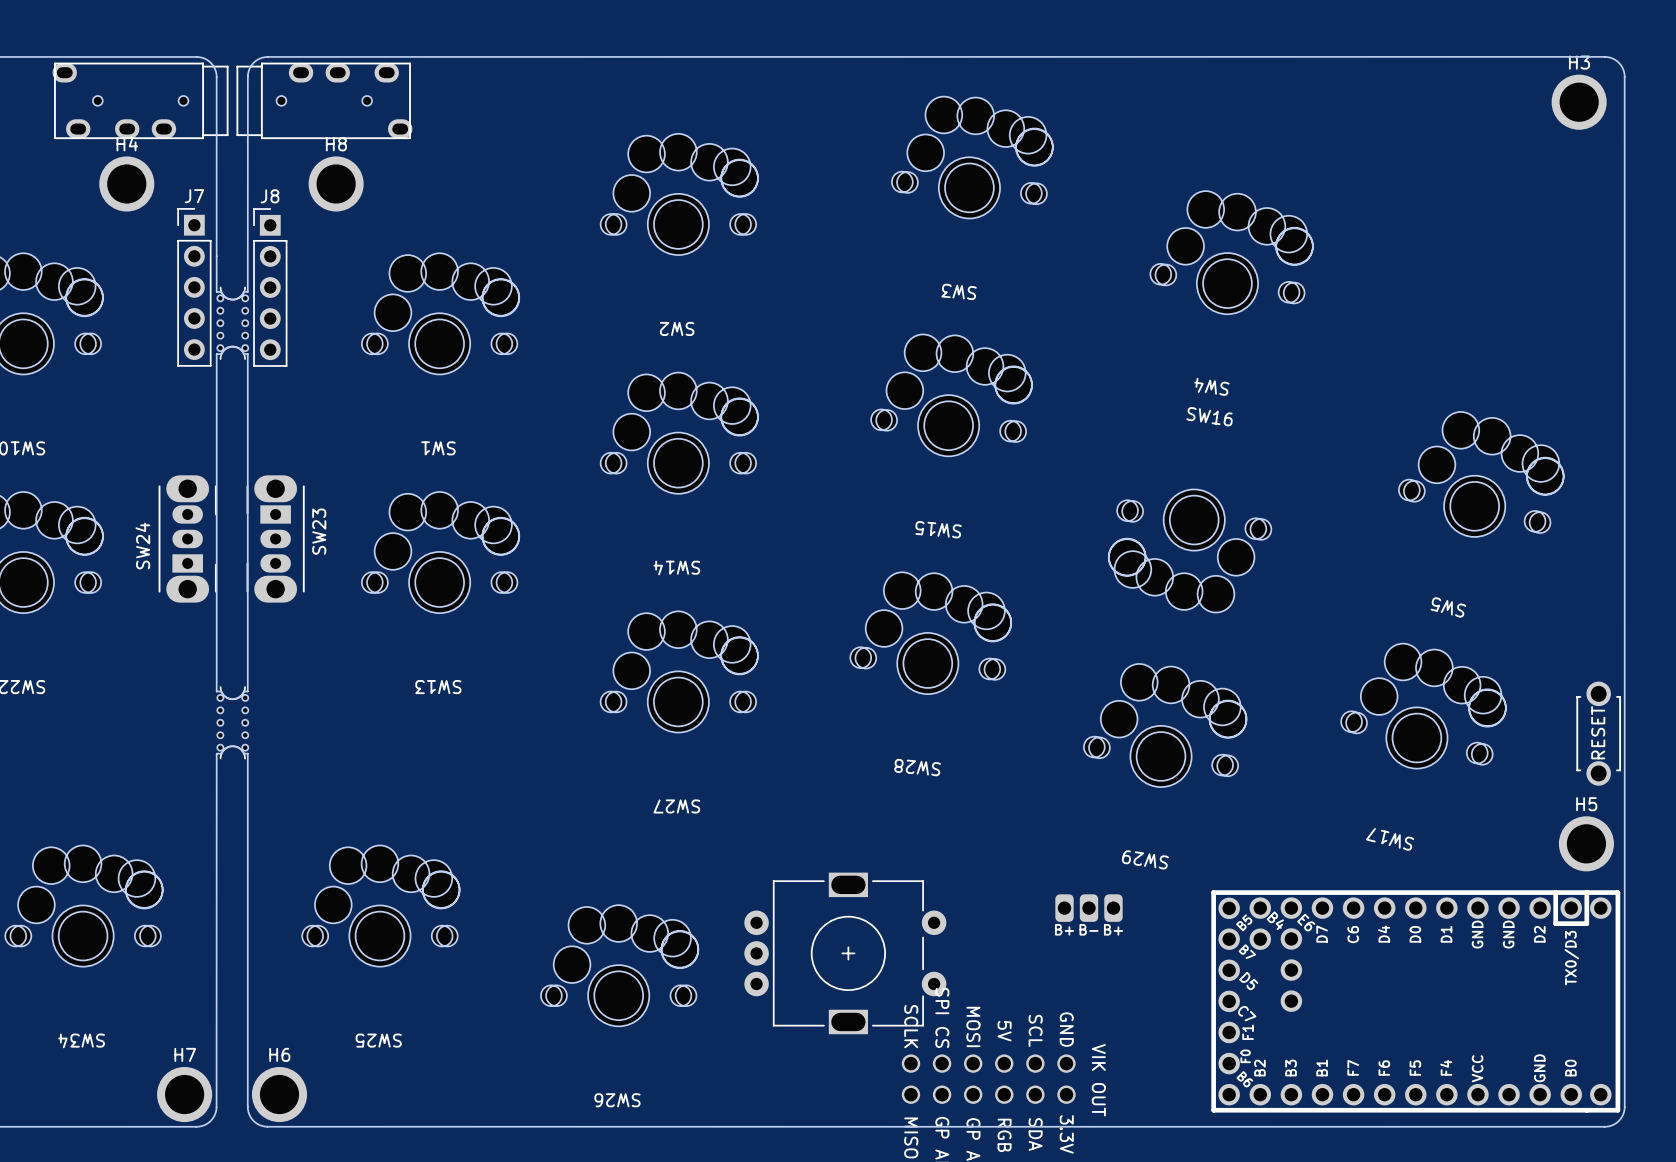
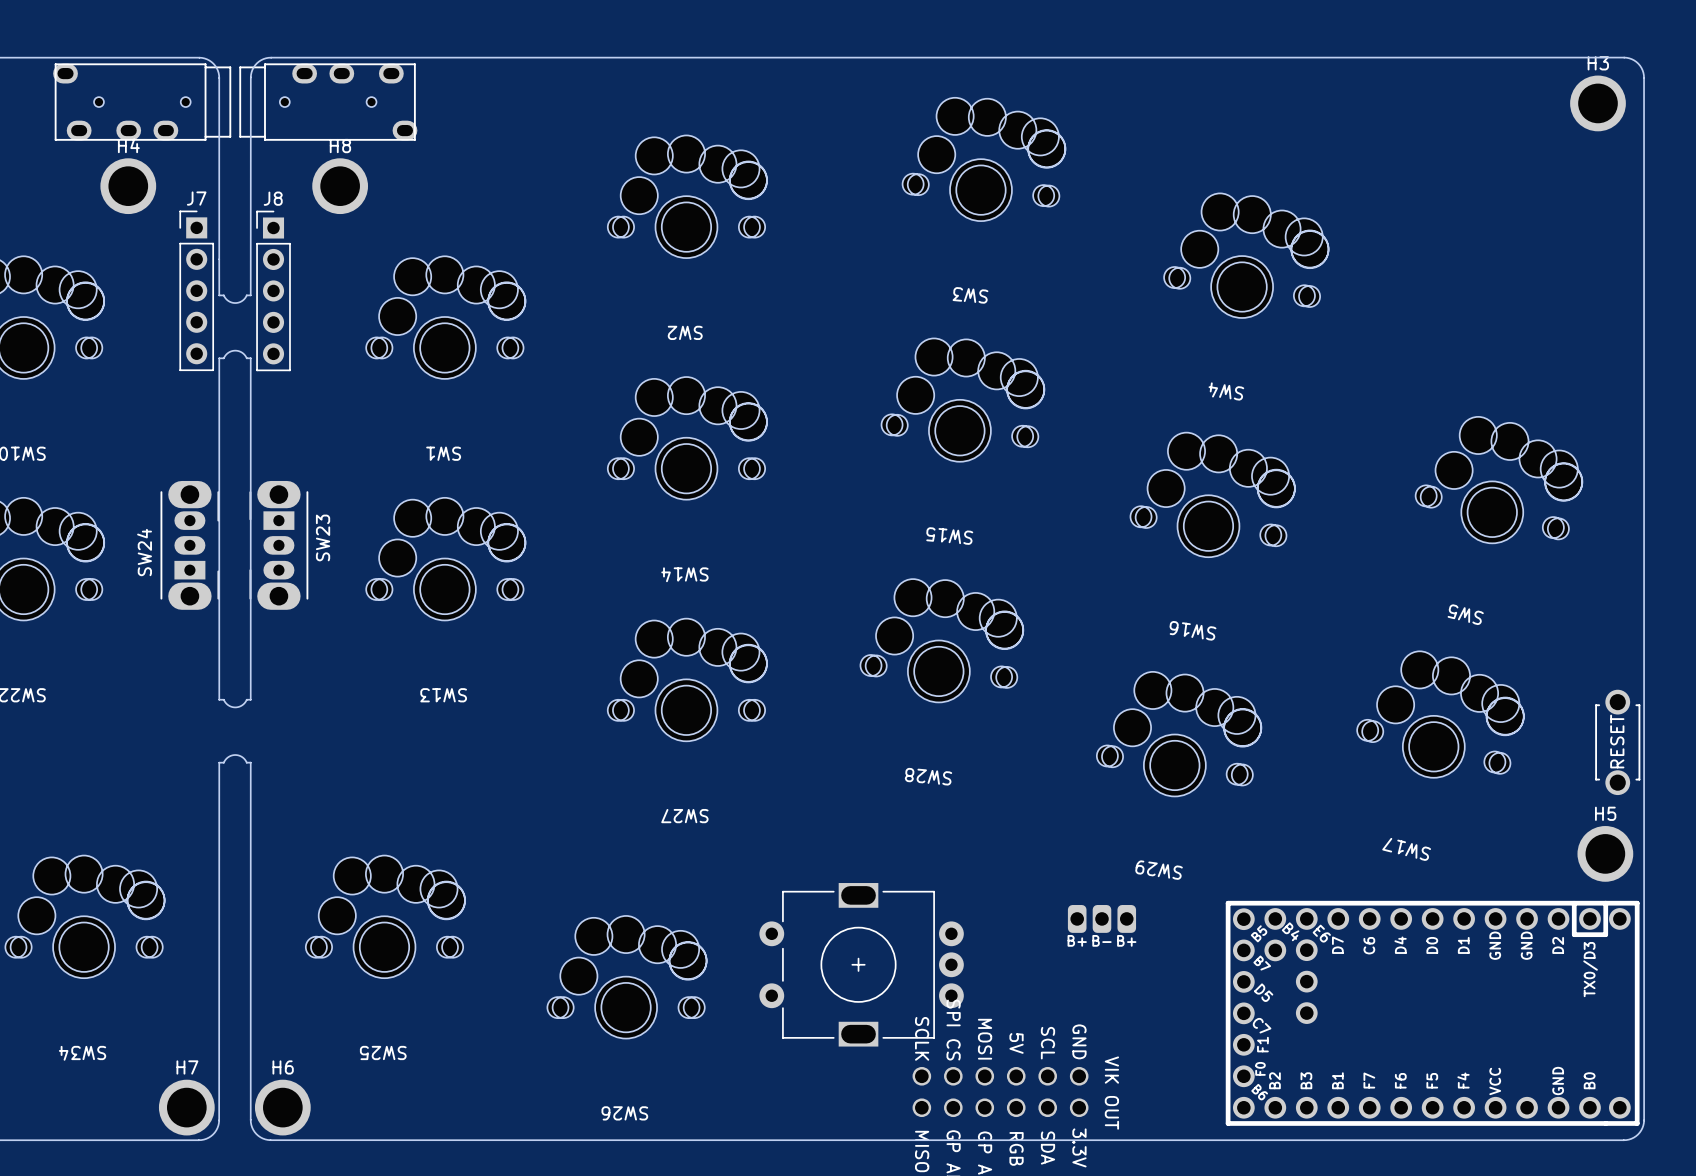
part: (232, 323) -> none
SW16 rotation: 0° (1190, 550) -> 180° (1212, 494)
part: (232, 722) -> none
part rotation: 0° (845, 953) -> 180° (861, 964)

